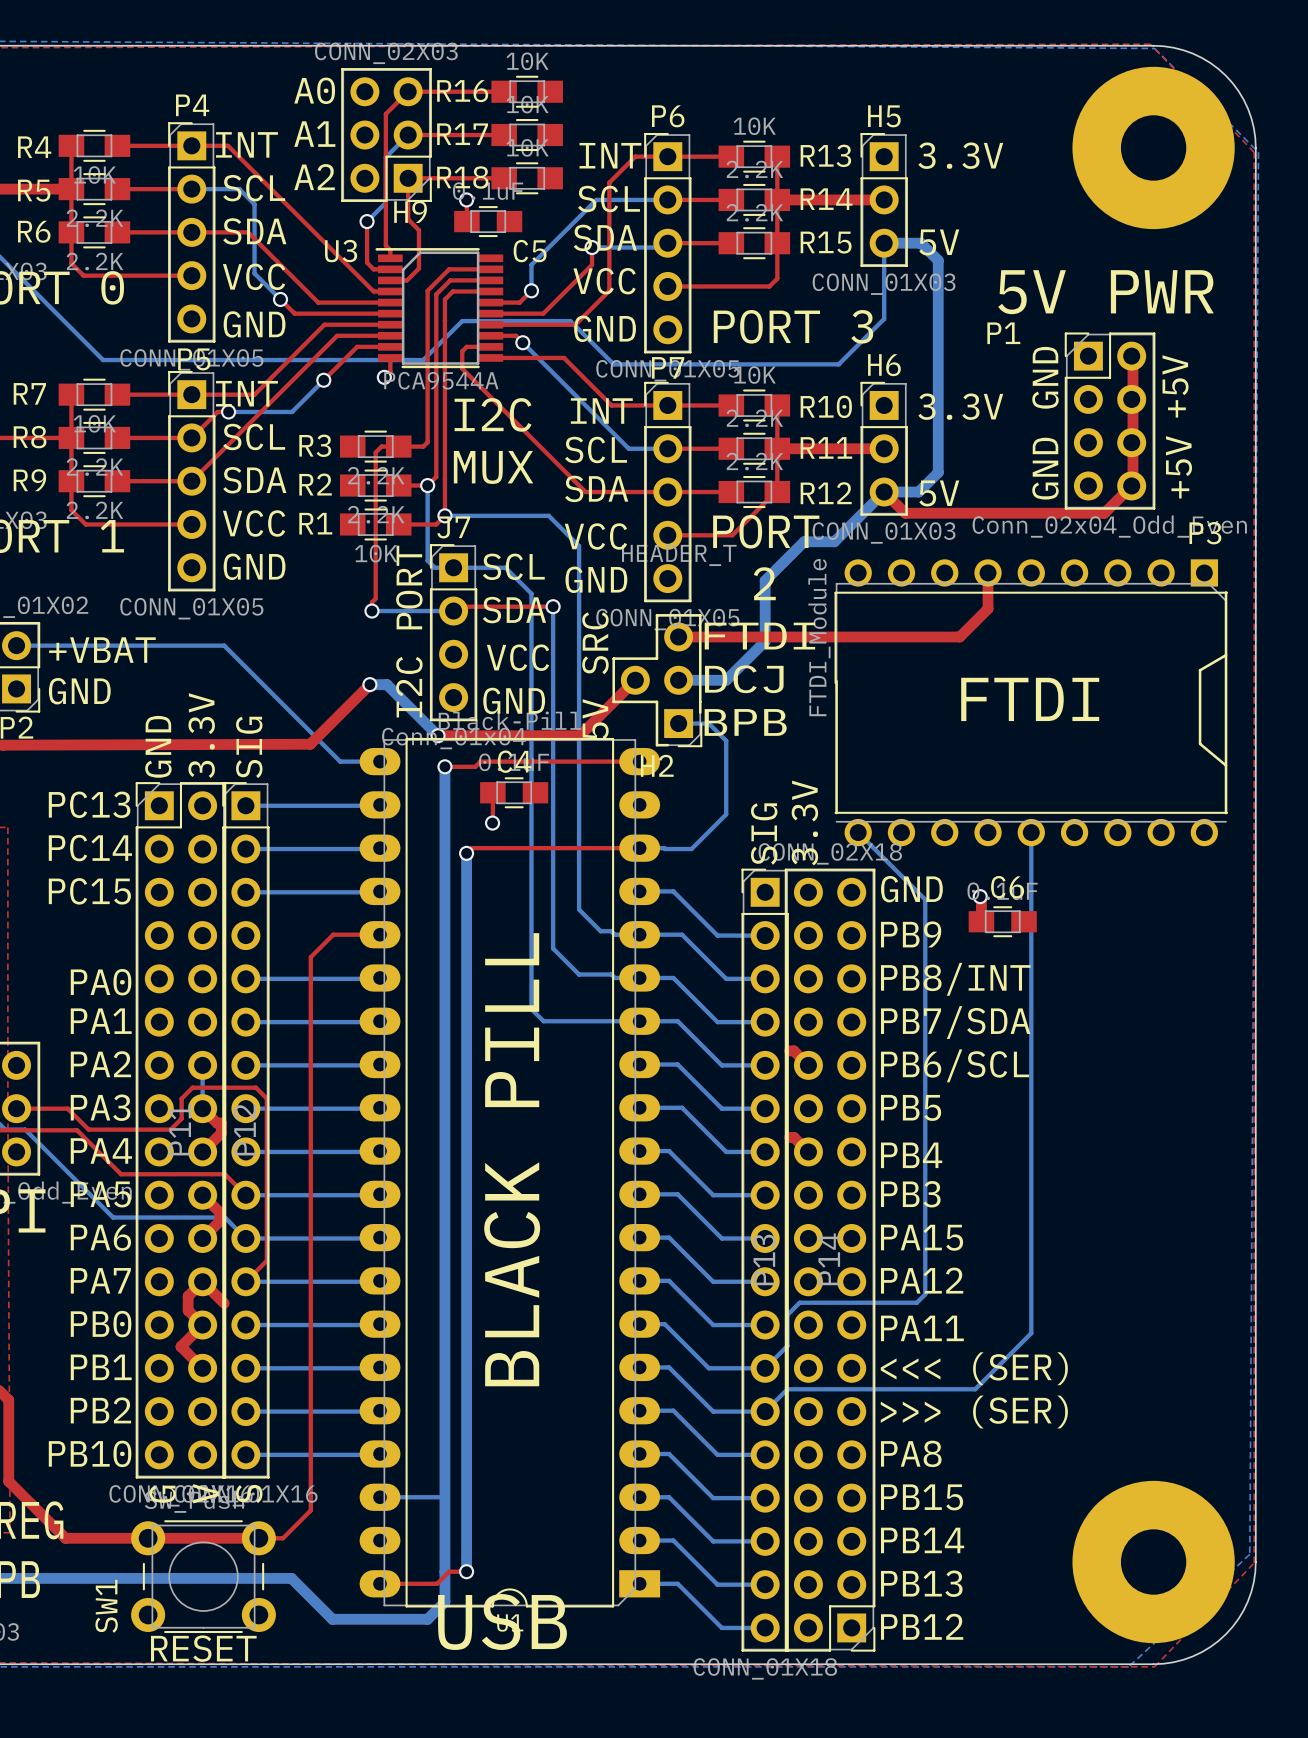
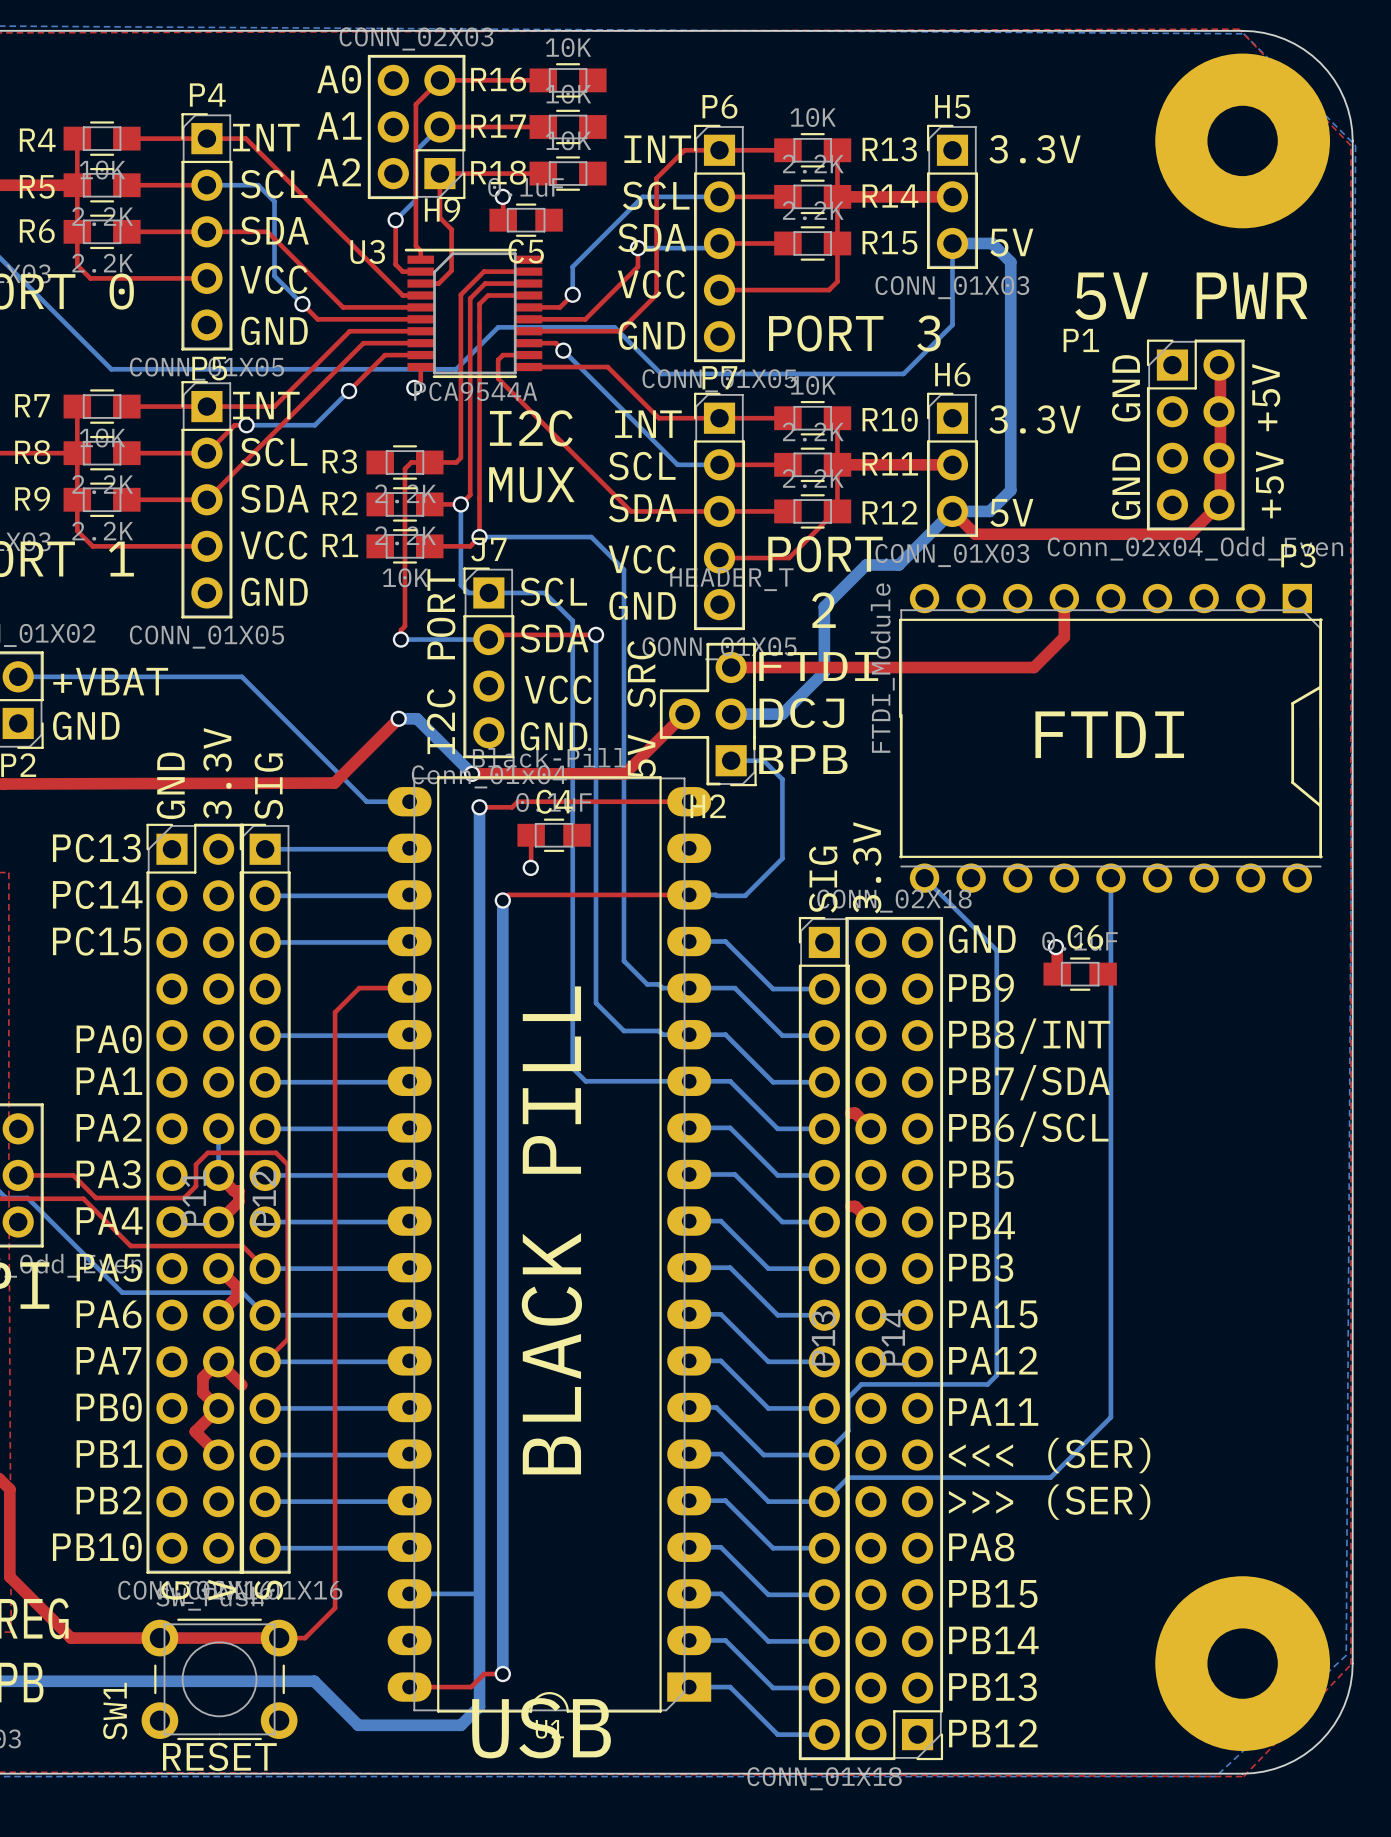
C5 name position: C5 (530, 251) -> C5 (526, 251)

